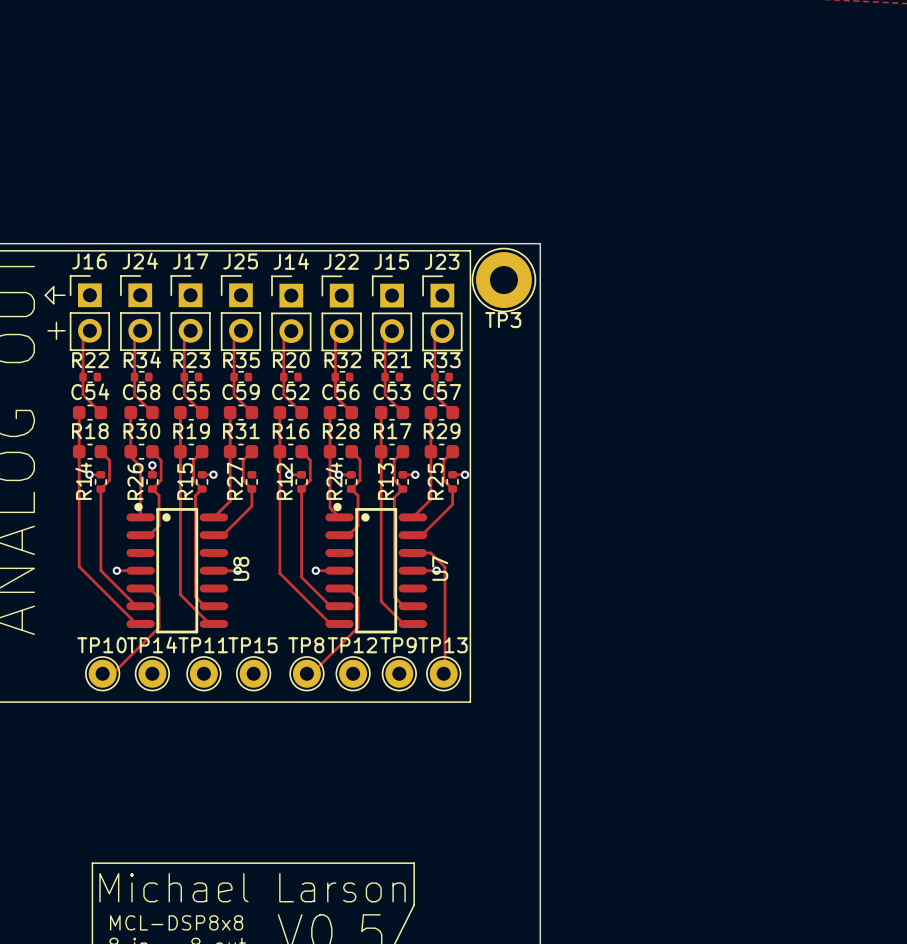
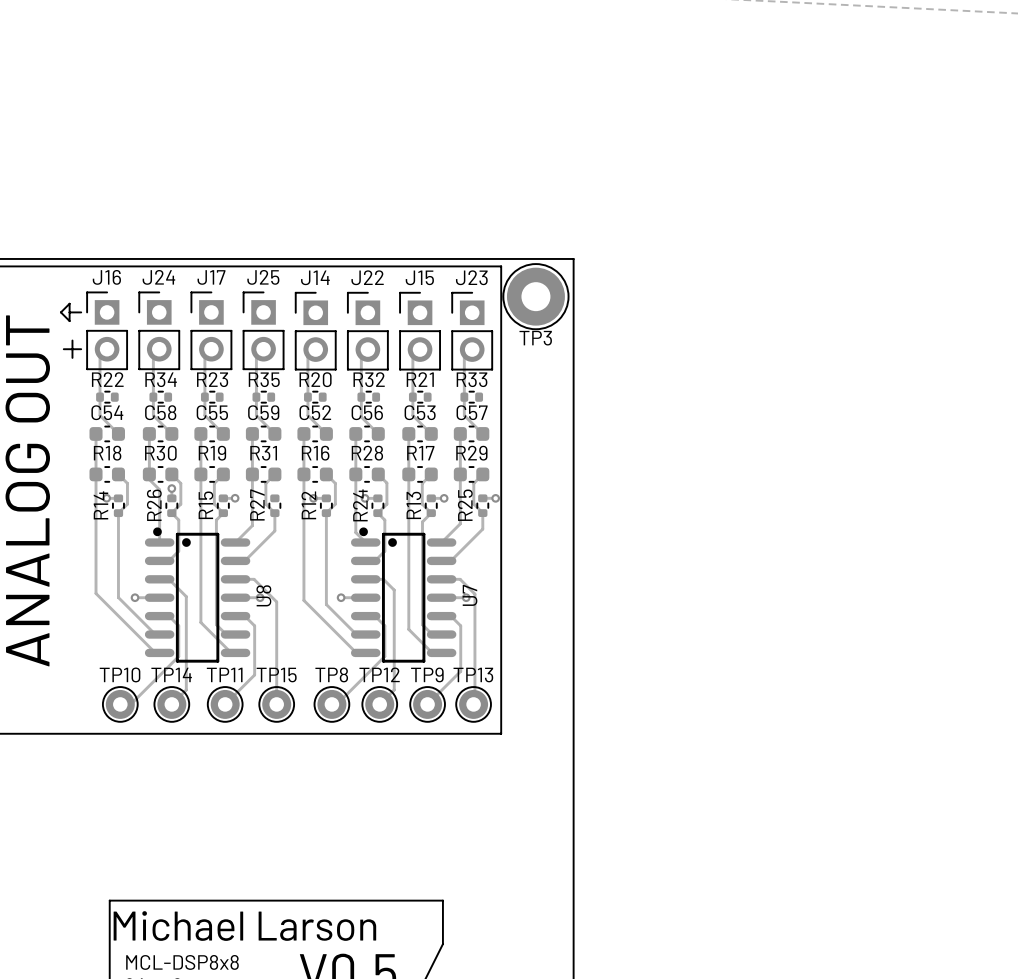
track: none -> (168, 579) (186, 596) (186, 689) (171, 704)
track: none -> (235, 579) (254, 579) (276, 601) (276, 704)
track: none -> (365, 579) (383, 579) (394, 590) (394, 689) (379, 704)
track: none -> (244, 616) (254, 625) (254, 674) (225, 704)
track: none -> (450, 616) (460, 625) (460, 671) (427, 704)

